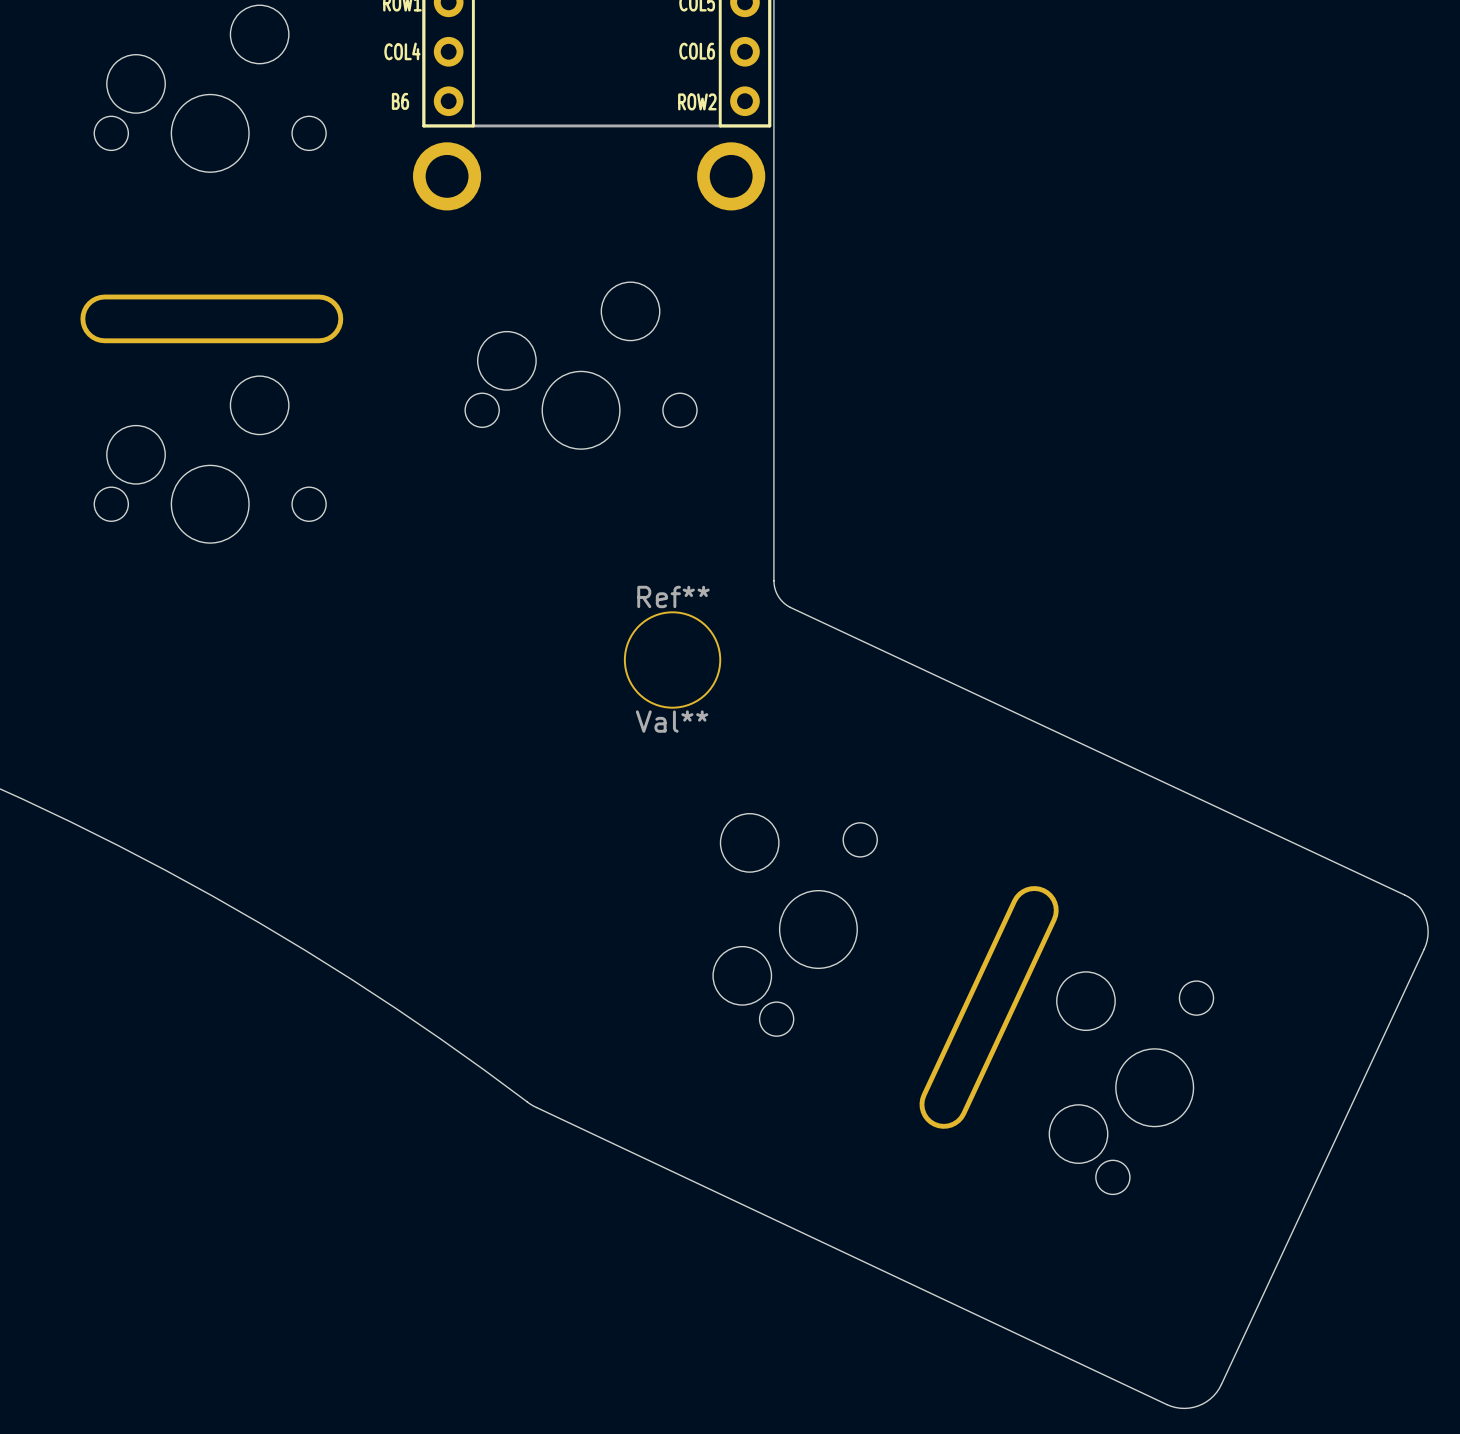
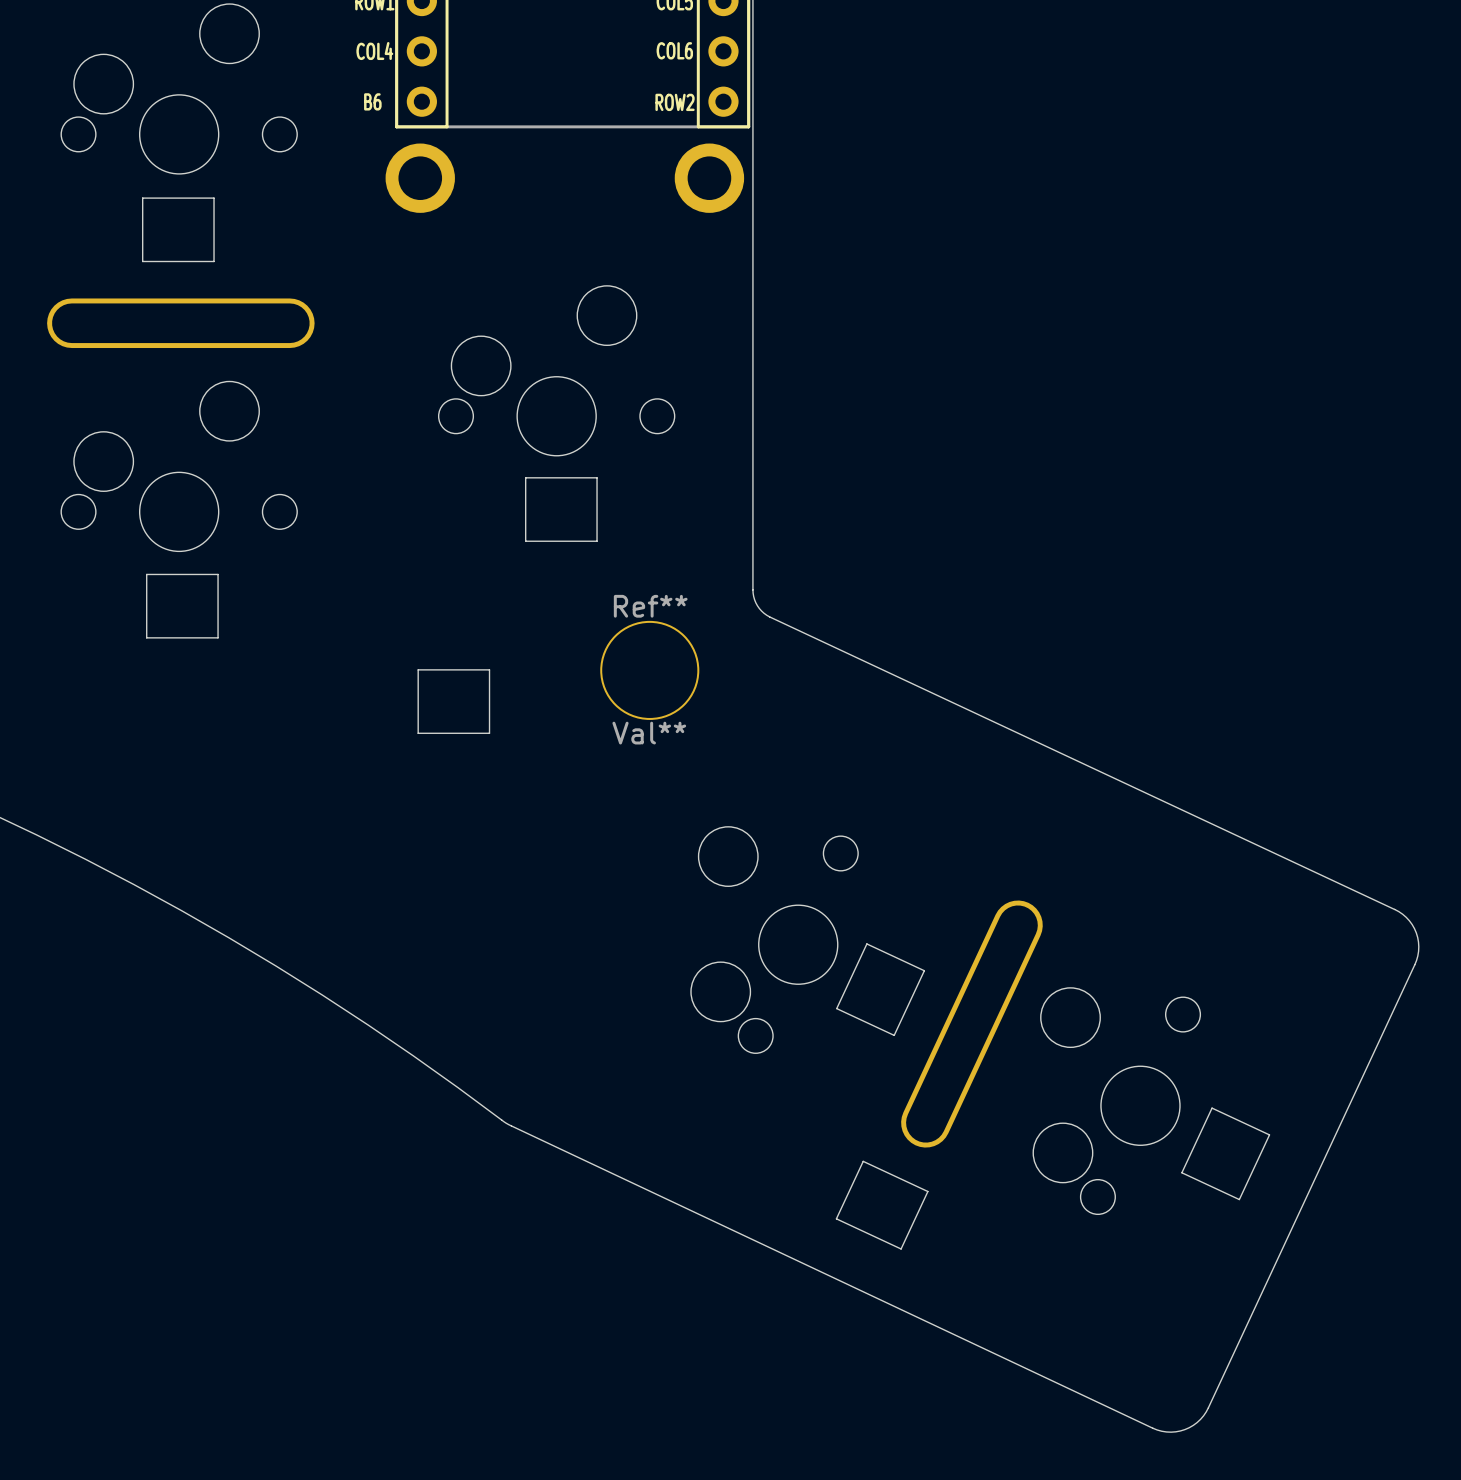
board edge: none -> (142, 198) (214, 198) (214, 261) (142, 261) (142, 198)
board edge: none -> (525, 477) (597, 477) (597, 541) (525, 541) (525, 477)
board edge: none -> (146, 574) (218, 574) (218, 637) (146, 637) (146, 574)
board edge: none -> (418, 669) (489, 669) (489, 733) (418, 733) (418, 669)
board edge: none -> (866, 943) (836, 1008) (894, 1035) (924, 970) (866, 943)
board edge: none -> (1212, 1108) (1269, 1134) (1239, 1199) (1181, 1172) (1212, 1108)
board edge: none -> (863, 1161) (927, 1191) (901, 1248) (836, 1218) (863, 1161)

